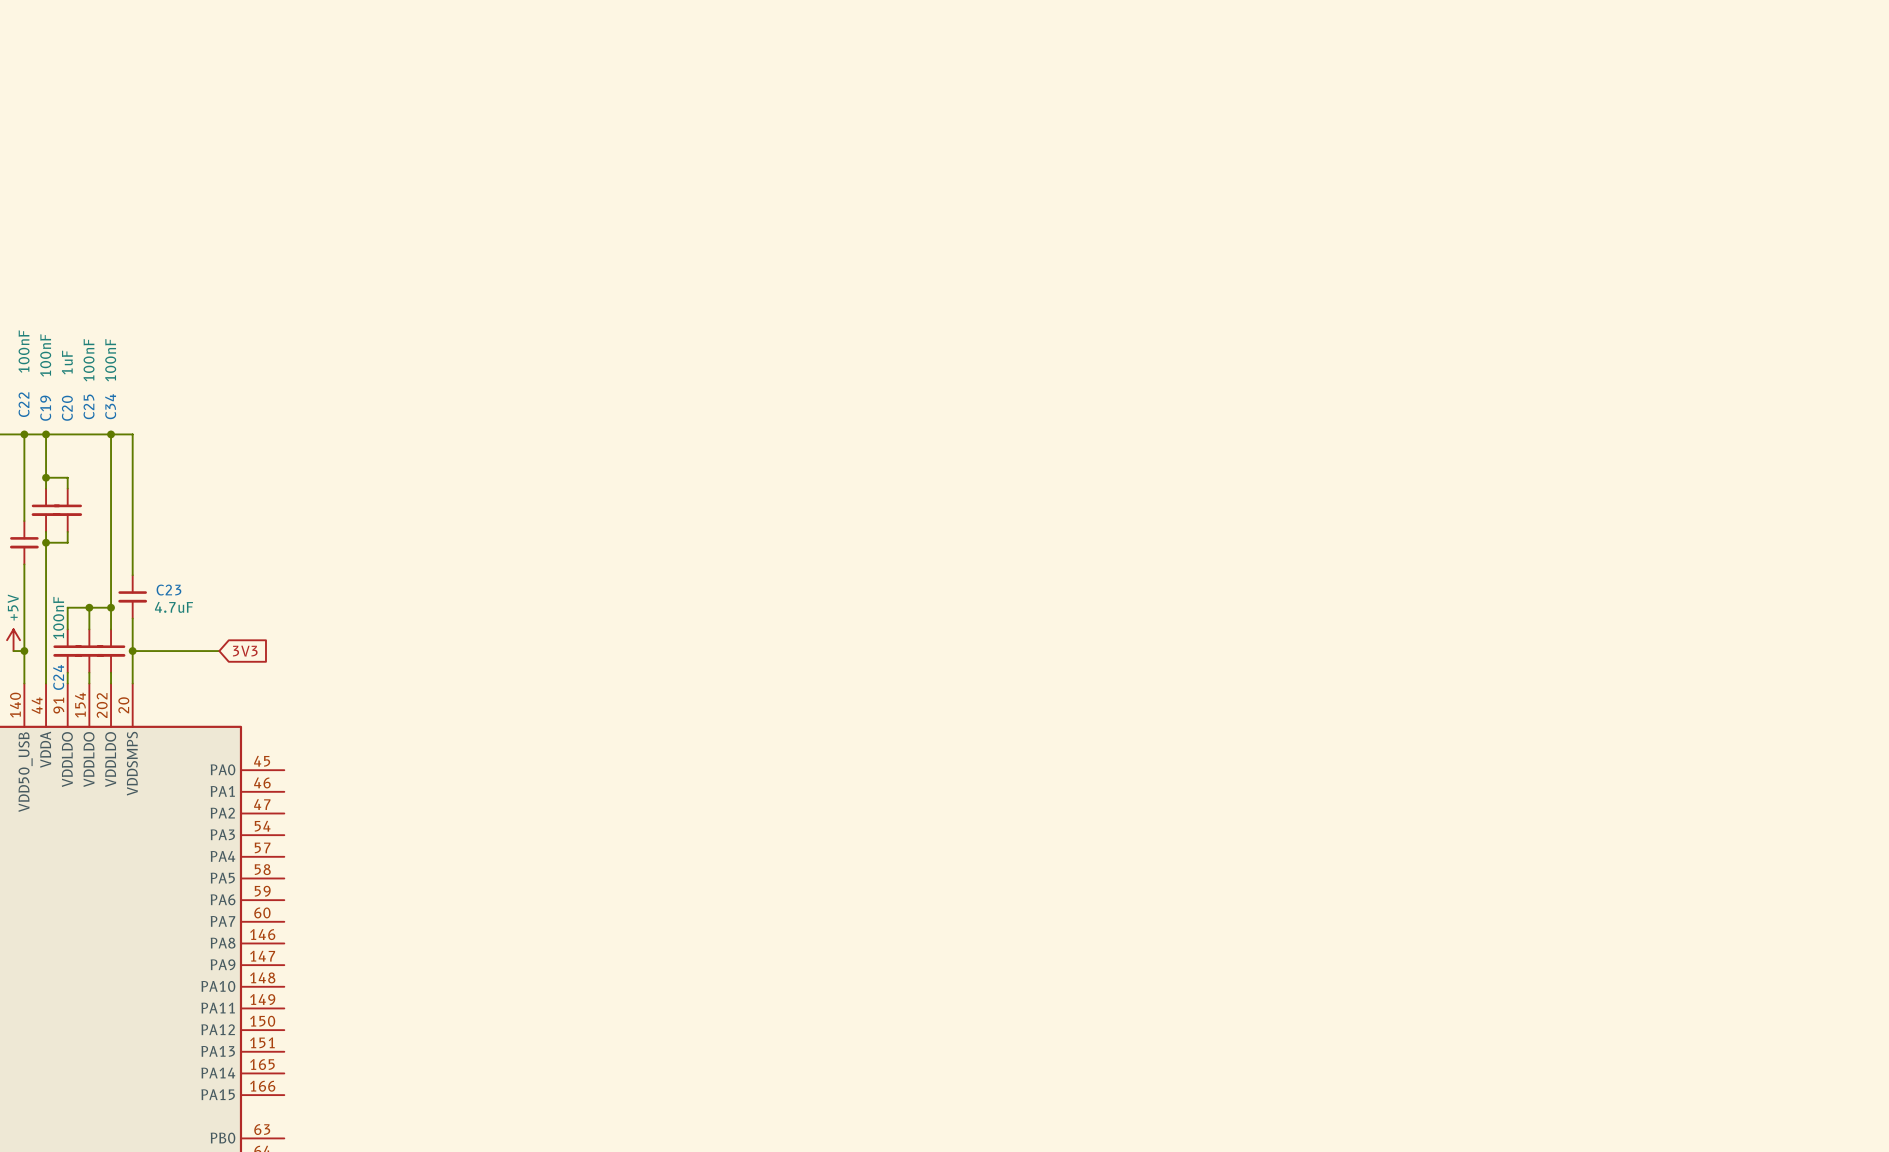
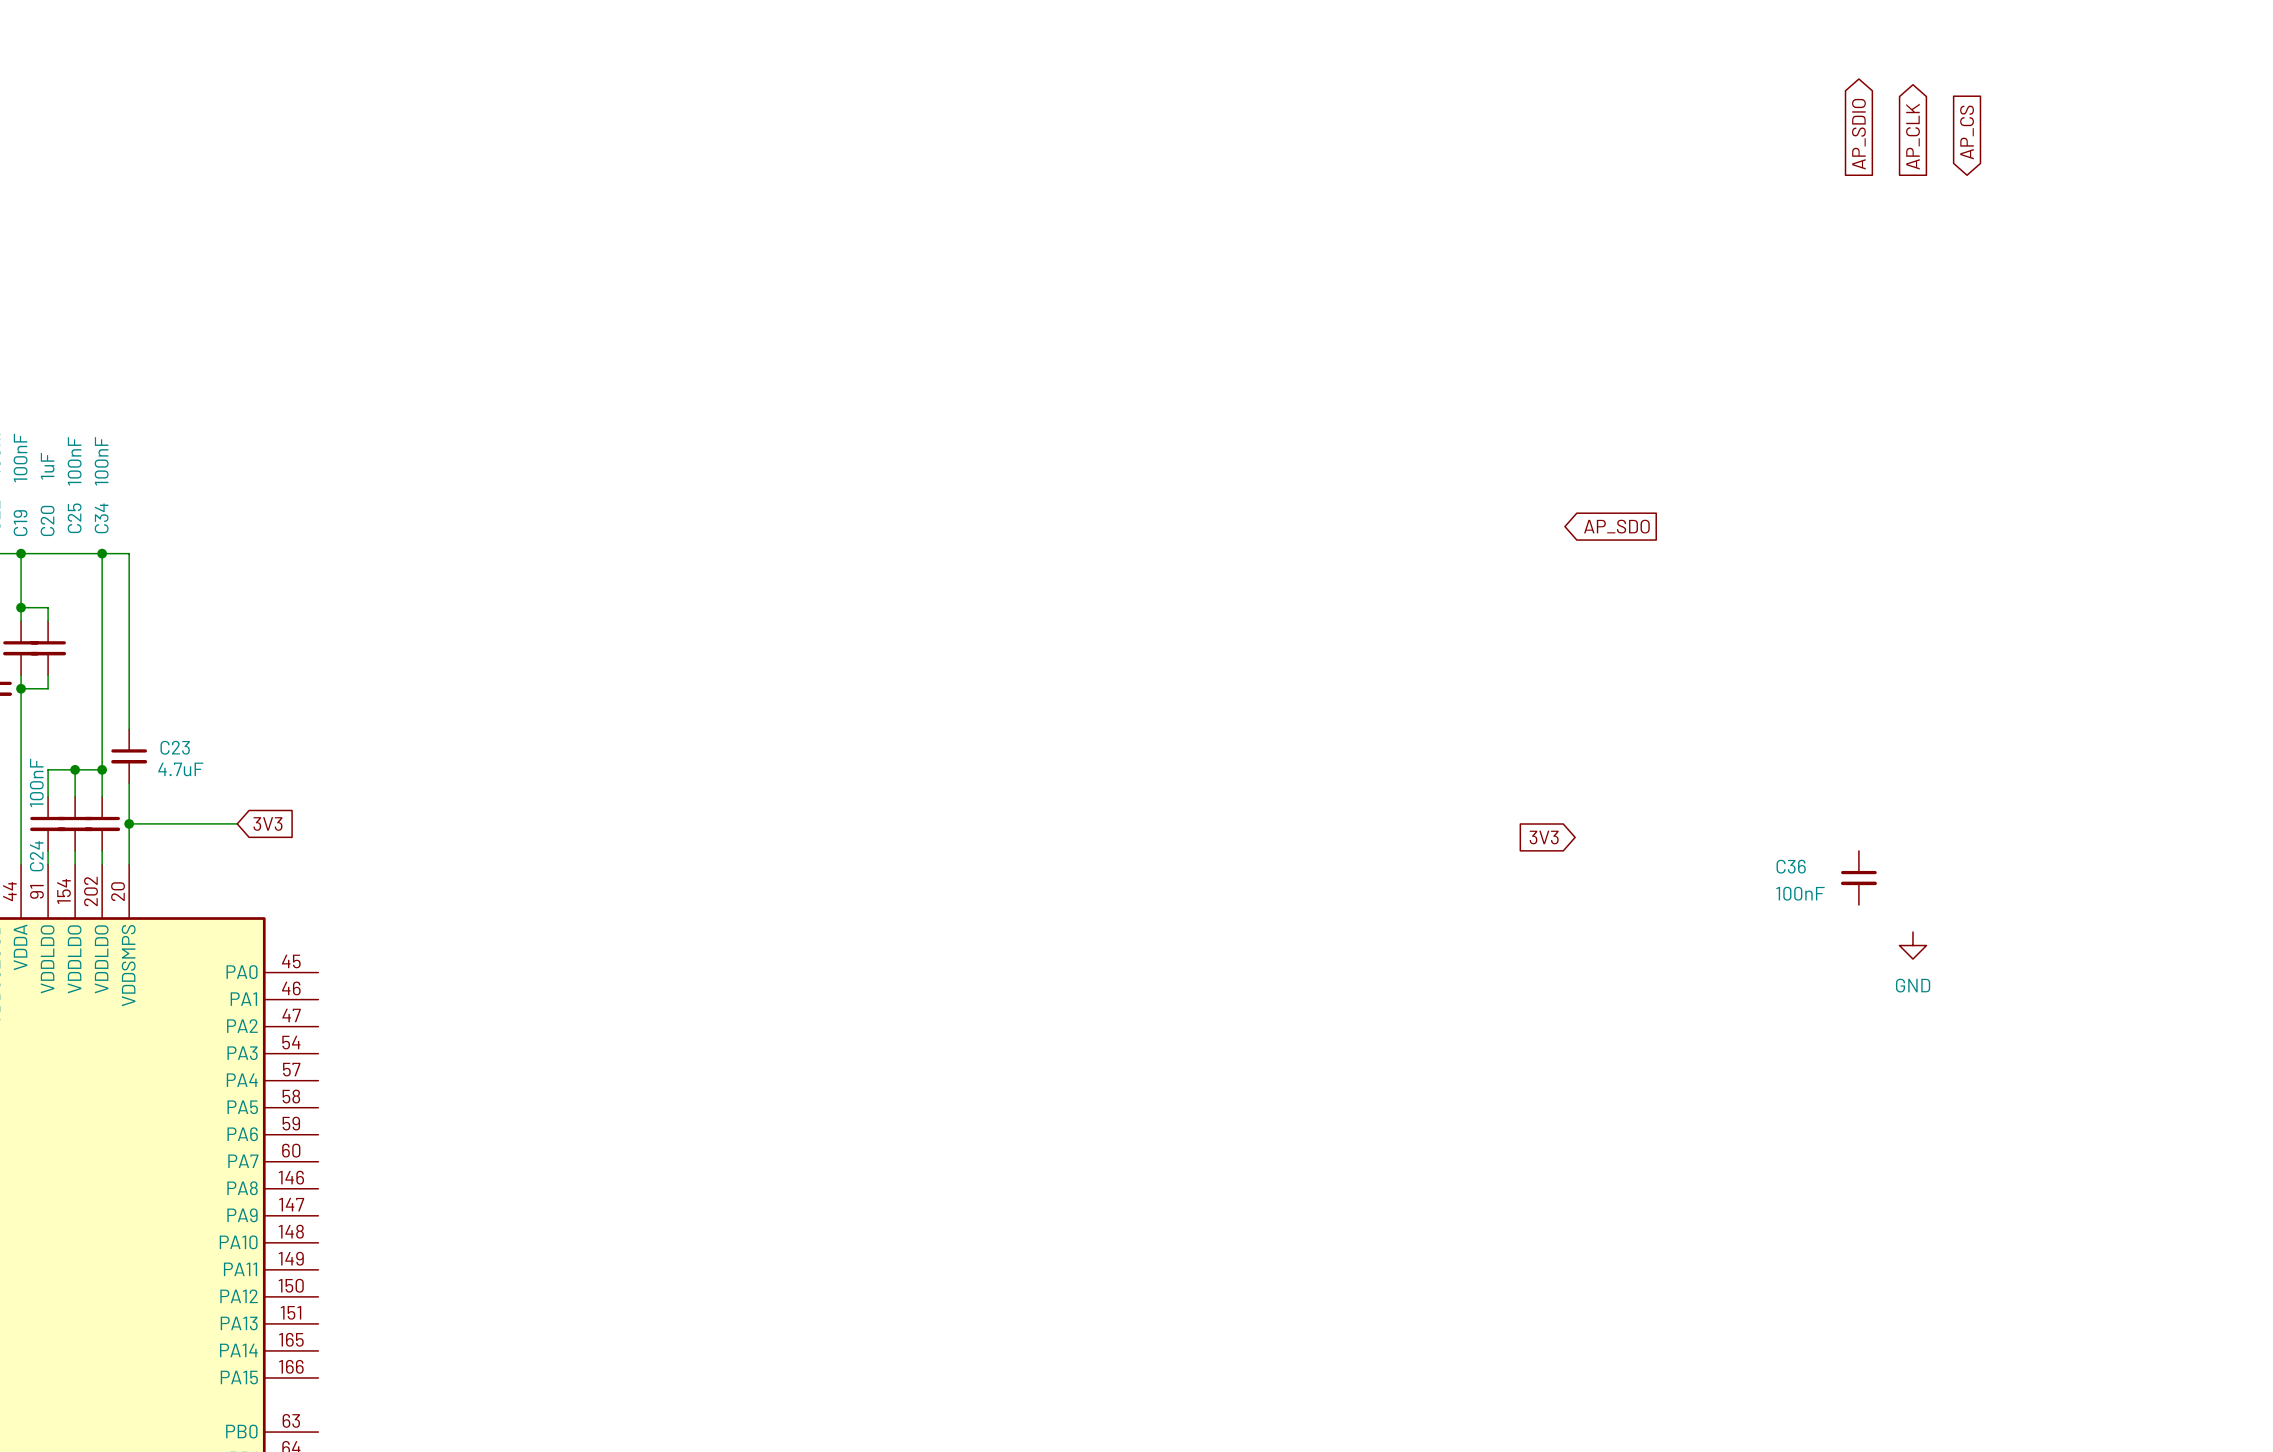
global label: none -> AP_SDIO (1858, 134)
global label: none -> AP_CS (1967, 132)
global label: none -> AP_CLK (1912, 136)
global label: none -> AP_SDO (1616, 526)
global label: none -> 3V3 (1544, 837)
C36: none -> 100nF (1858, 877)
power symbol: none -> GND (1912, 945)

